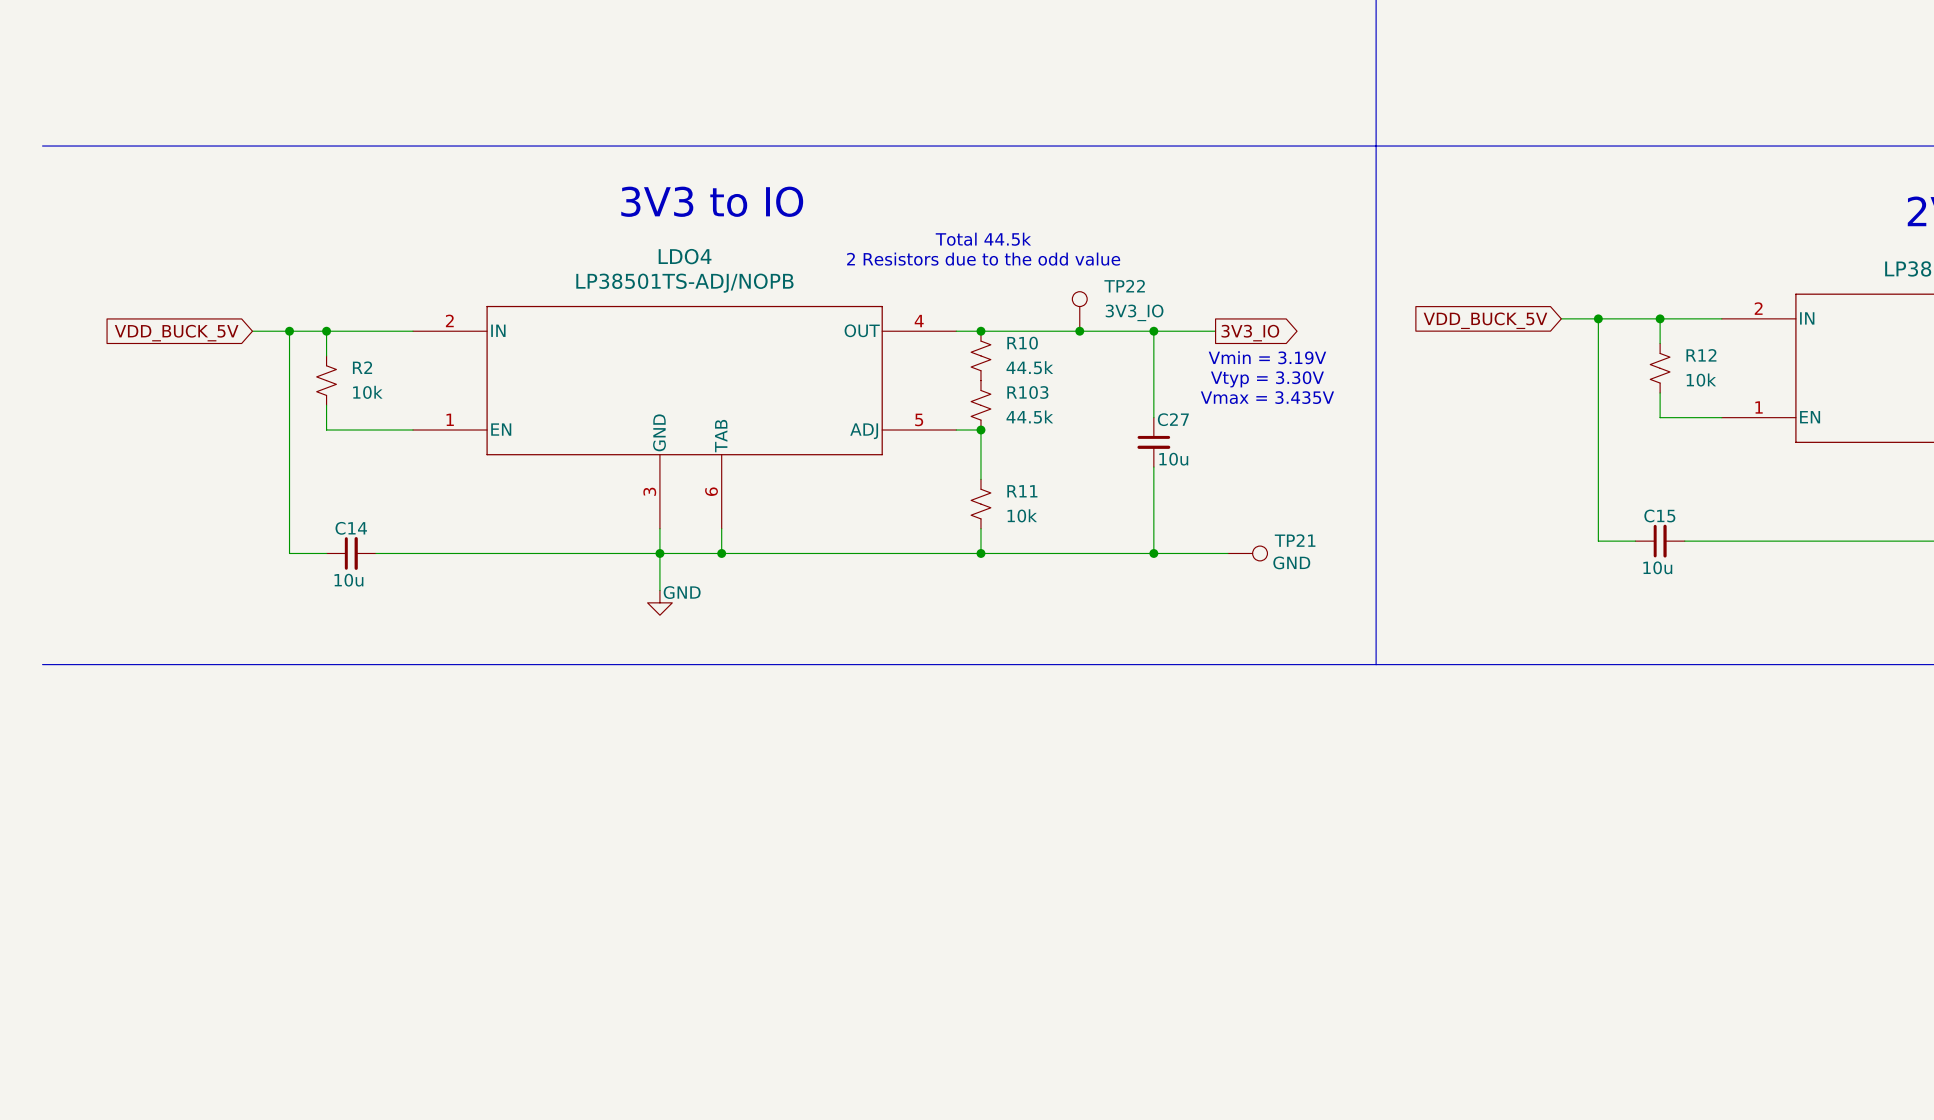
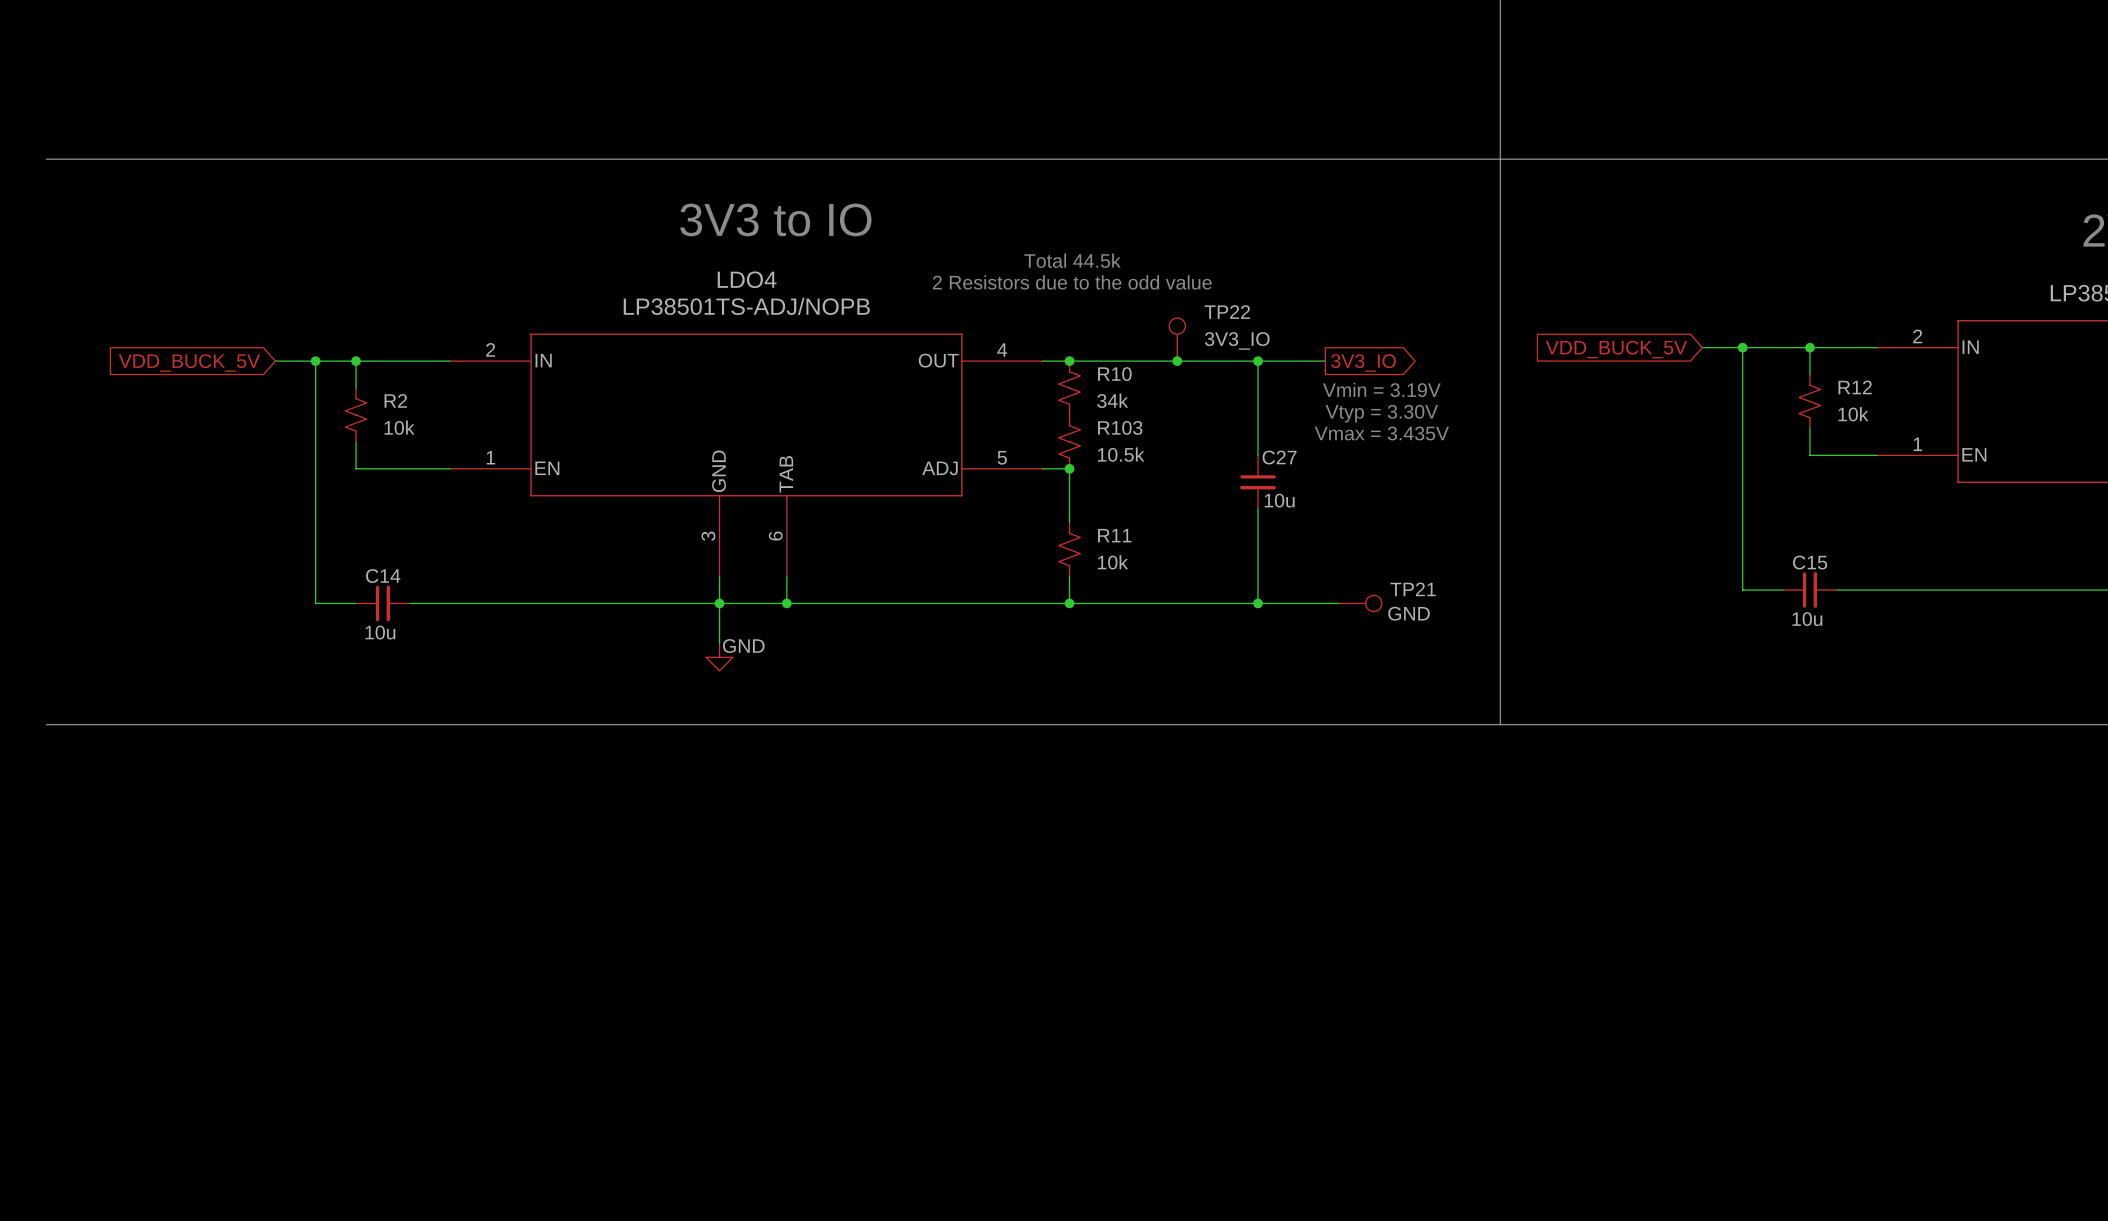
R10 value: 44.5k (1029, 367) -> 34k (1112, 400)
R103 value: 44.5k (1029, 417) -> 10.5k (1121, 454)

